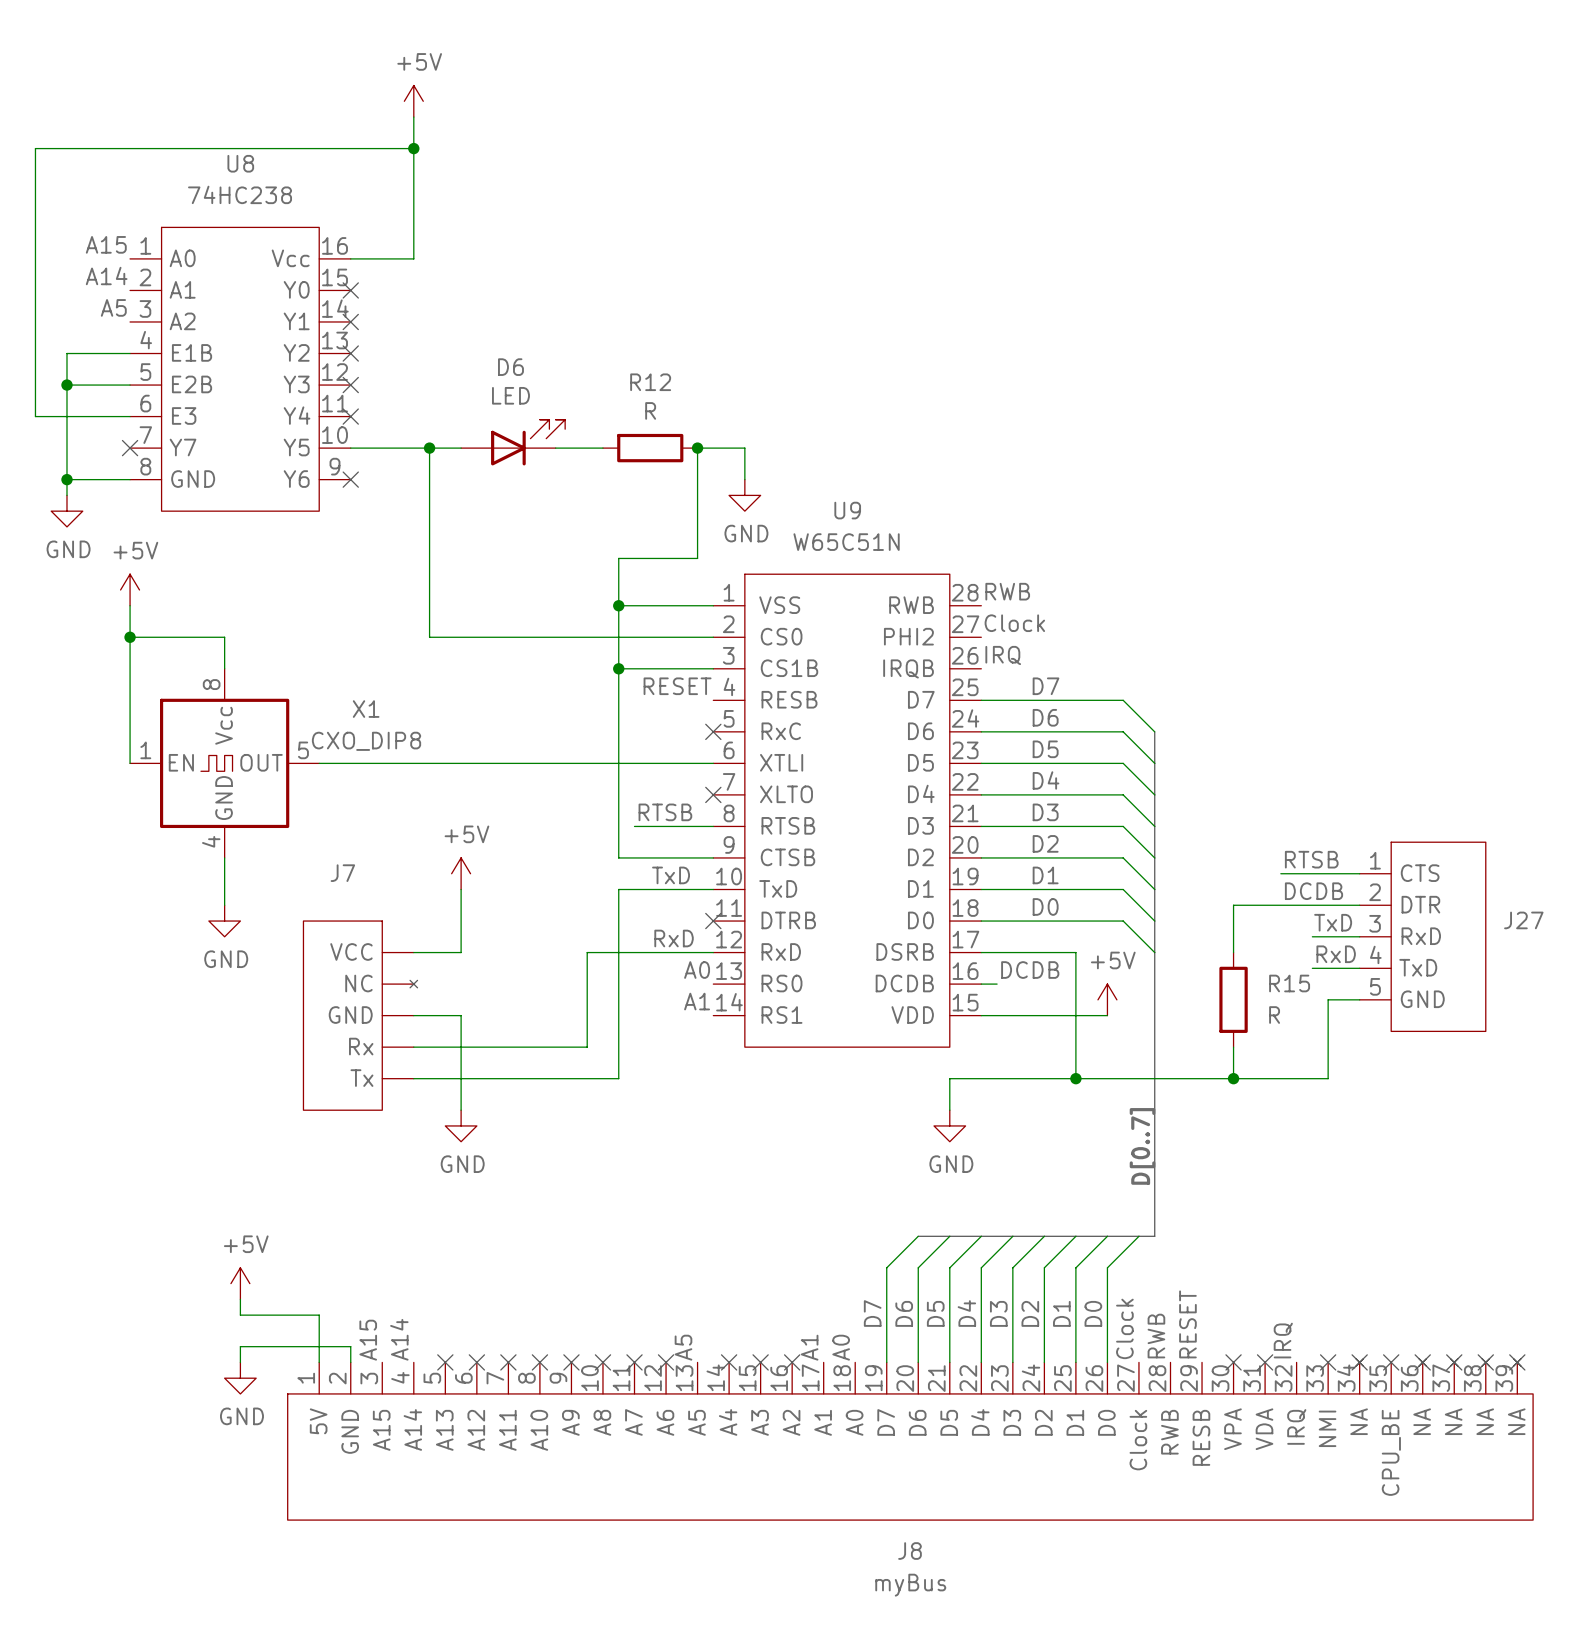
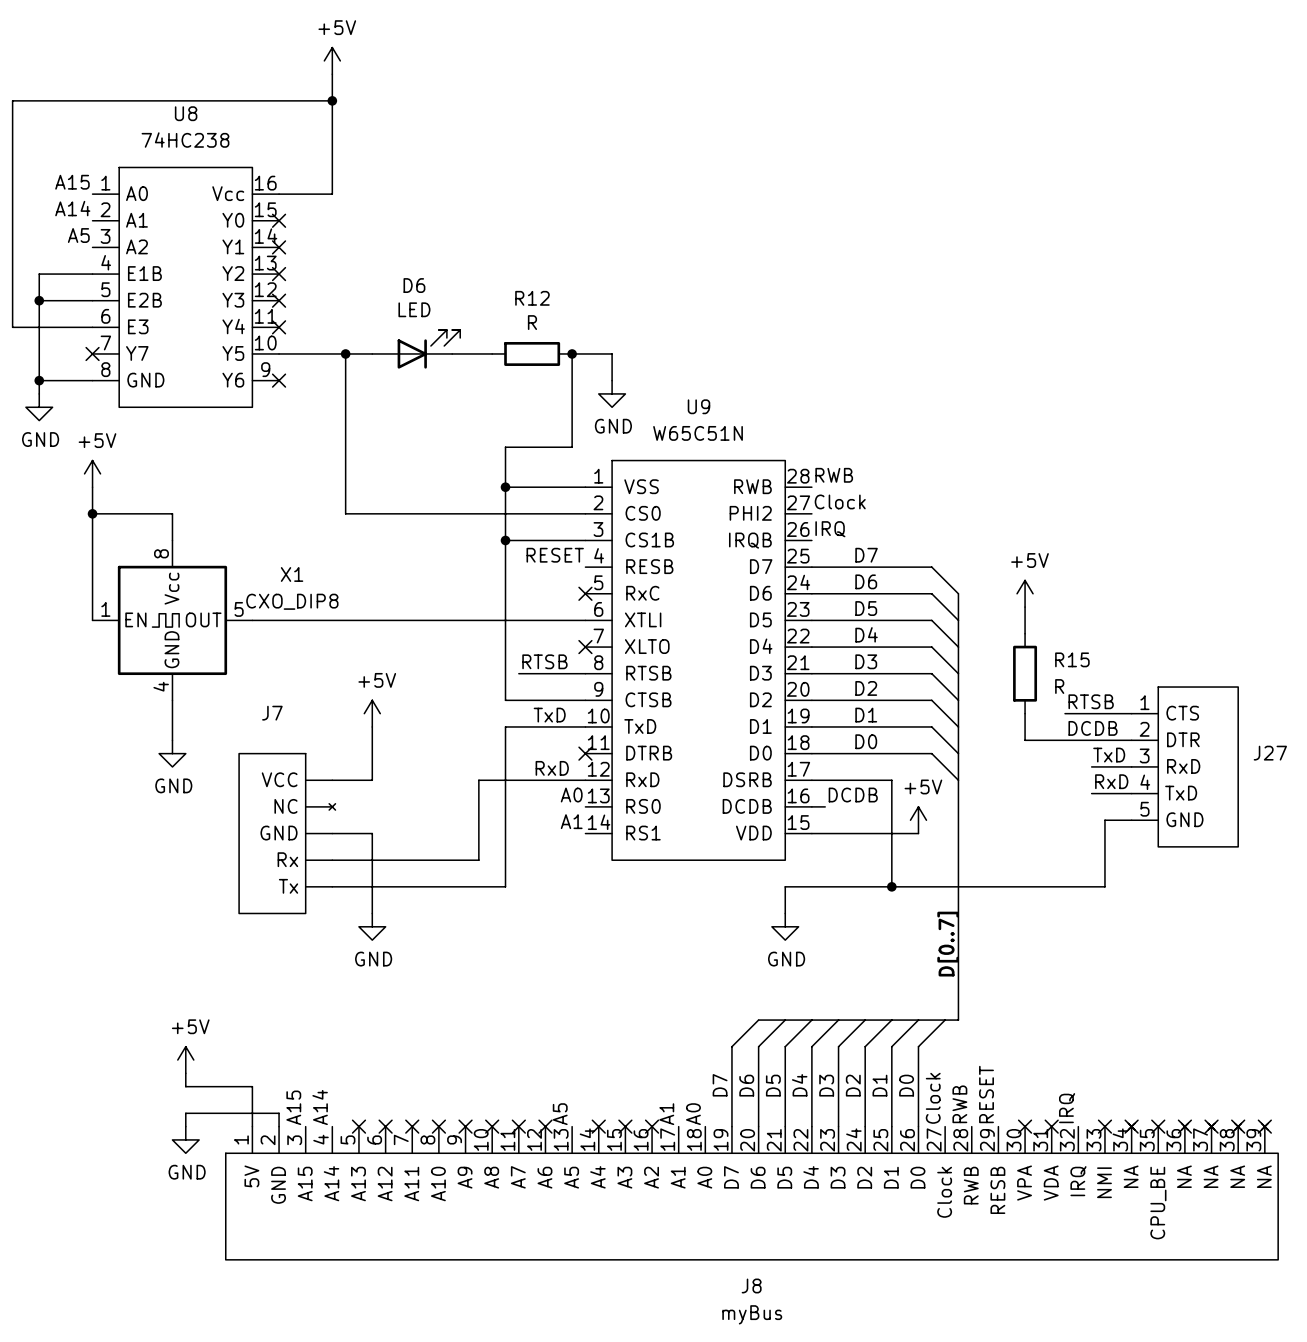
power symbol: none -> +5V (1025, 593)
wire: (1233, 905) (1233, 952) -> (1025, 740) (1025, 713)
R15 position: (1233, 999) -> (1025, 673)
wire: (1233, 1047) (1233, 1078) -> (1025, 607) (1025, 633)
junction: (1233, 1078) -> none

